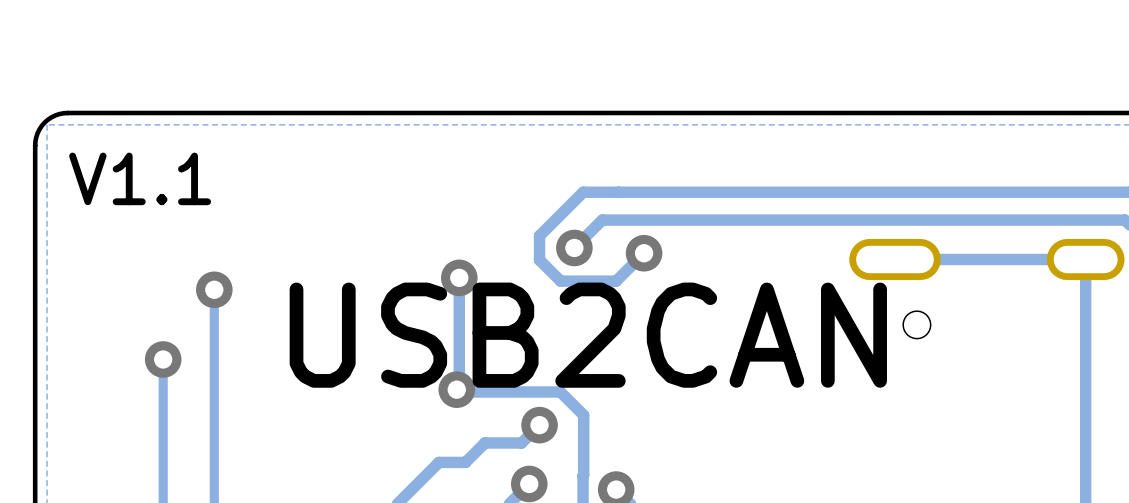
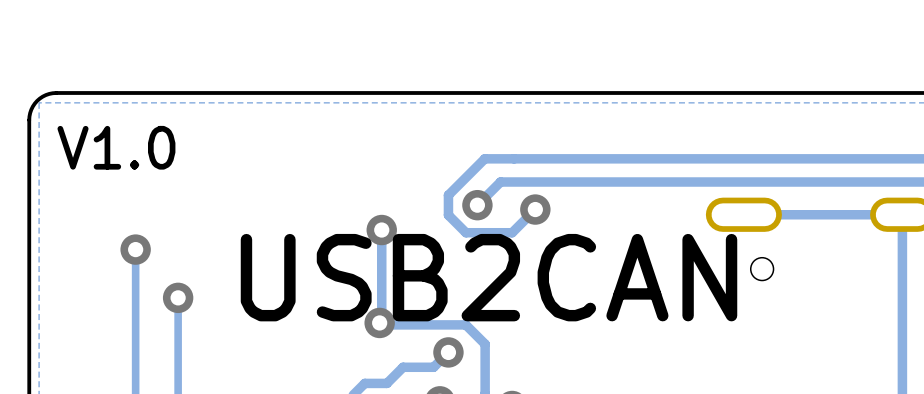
text: V1.1 (140, 178) -> V1.0 (116, 147)
track: (214, 289) (214, 359) -> none
via: (214, 289) -> none
track: none -> (135, 249) (135, 297)
via: none -> (135, 249)
via: (163, 359) -> none
via: none -> (178, 297)

